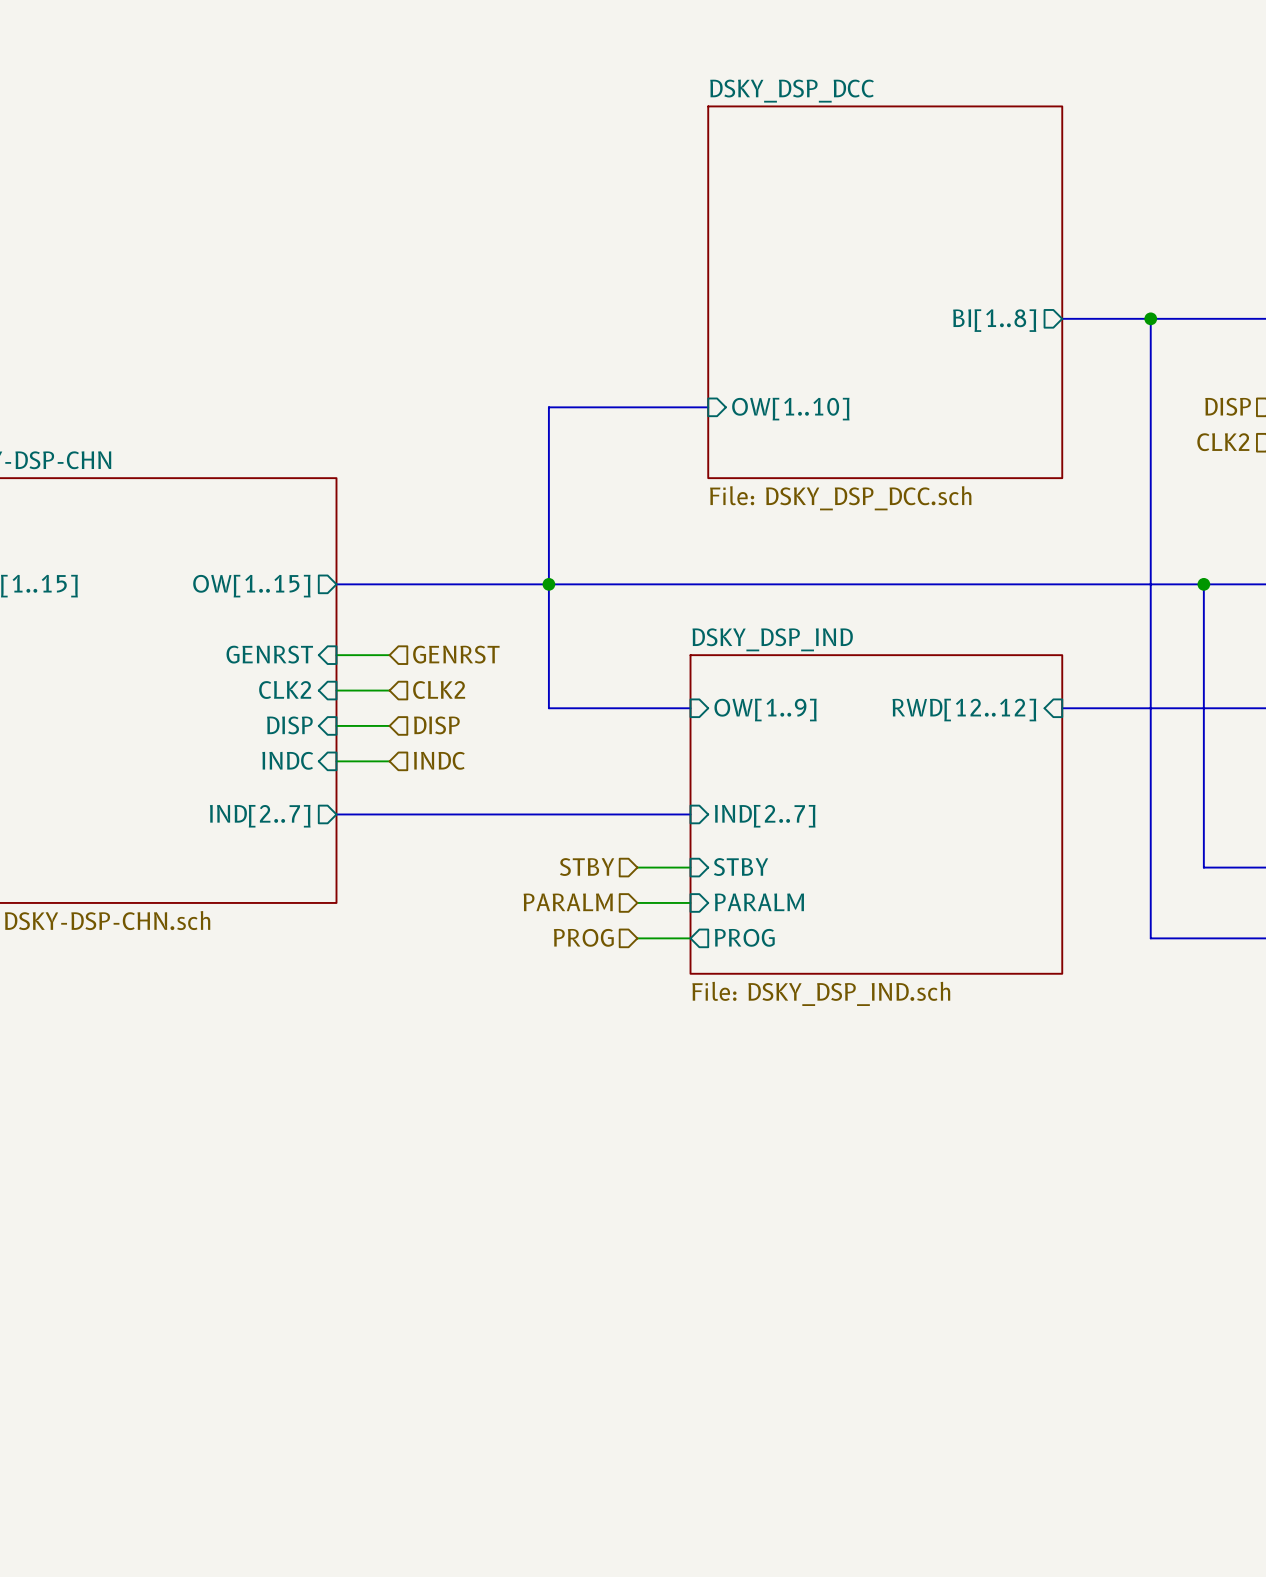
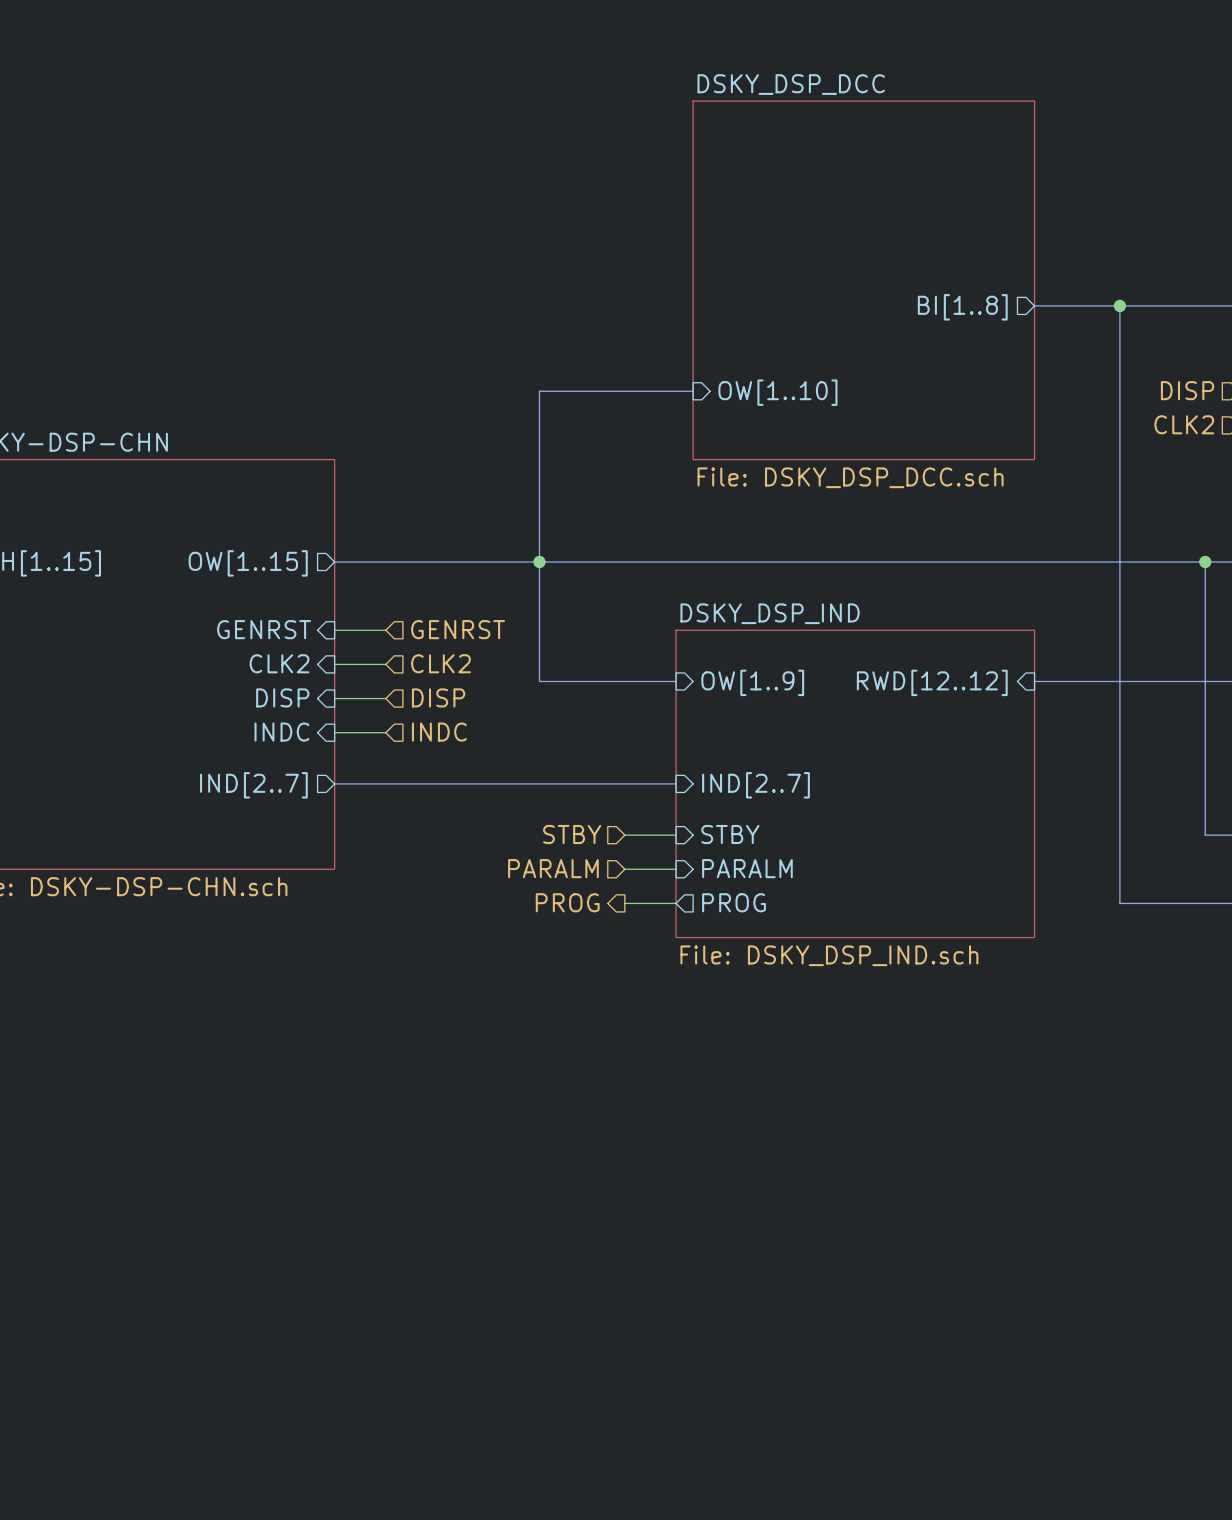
bus: (1203, 584) (1203, 867) (1239, 867) -> (1205, 561) (1205, 835)
junction position: (1203, 584) -> (1205, 561)
hierarchical label shape: input (583, 937) -> output (567, 902)

